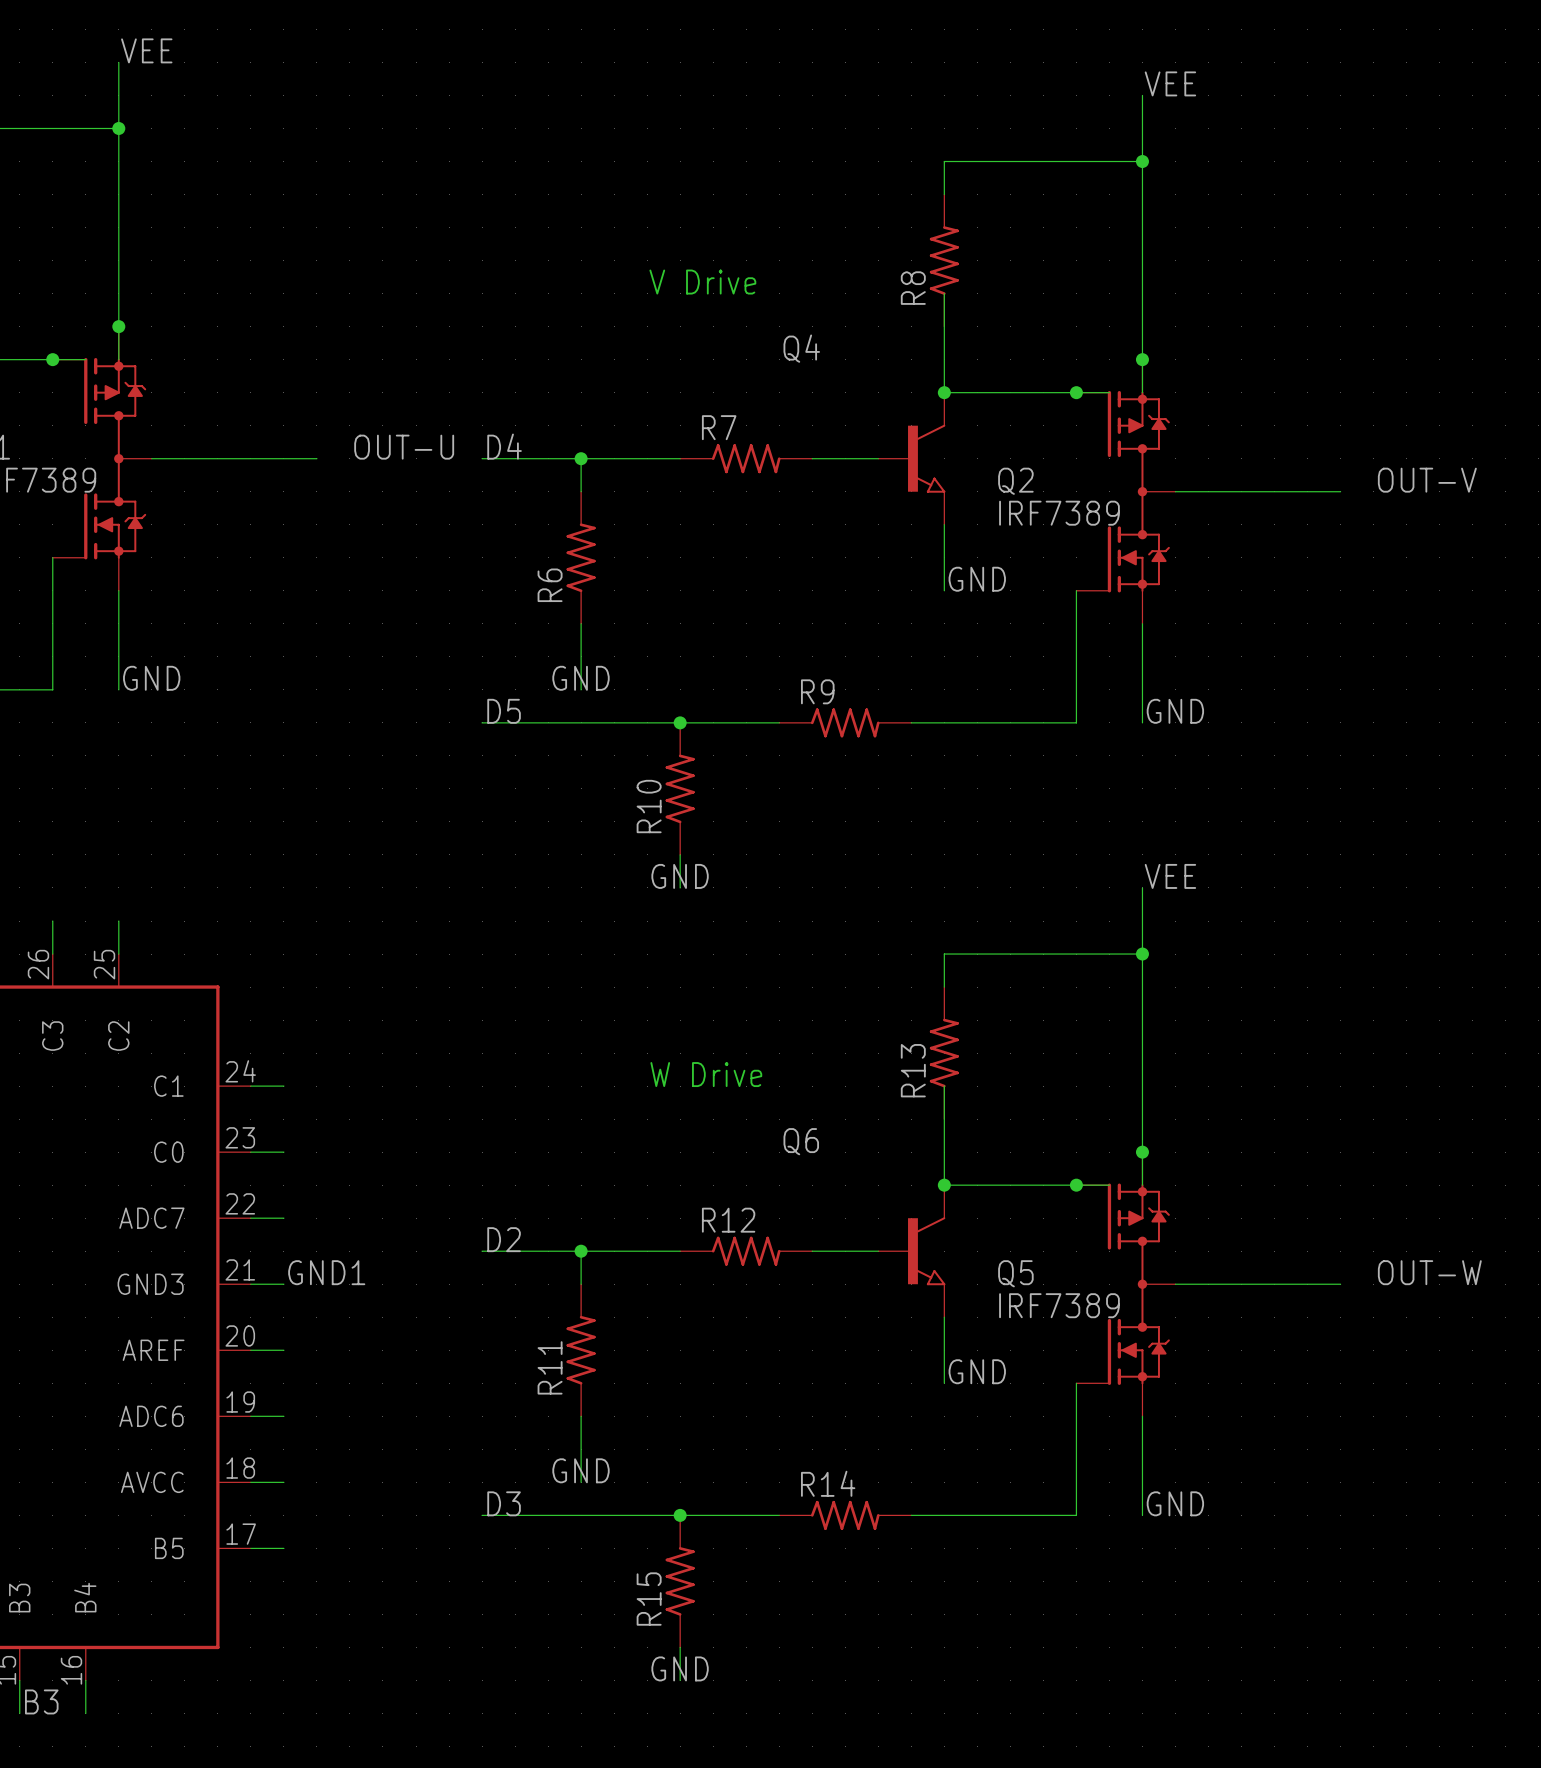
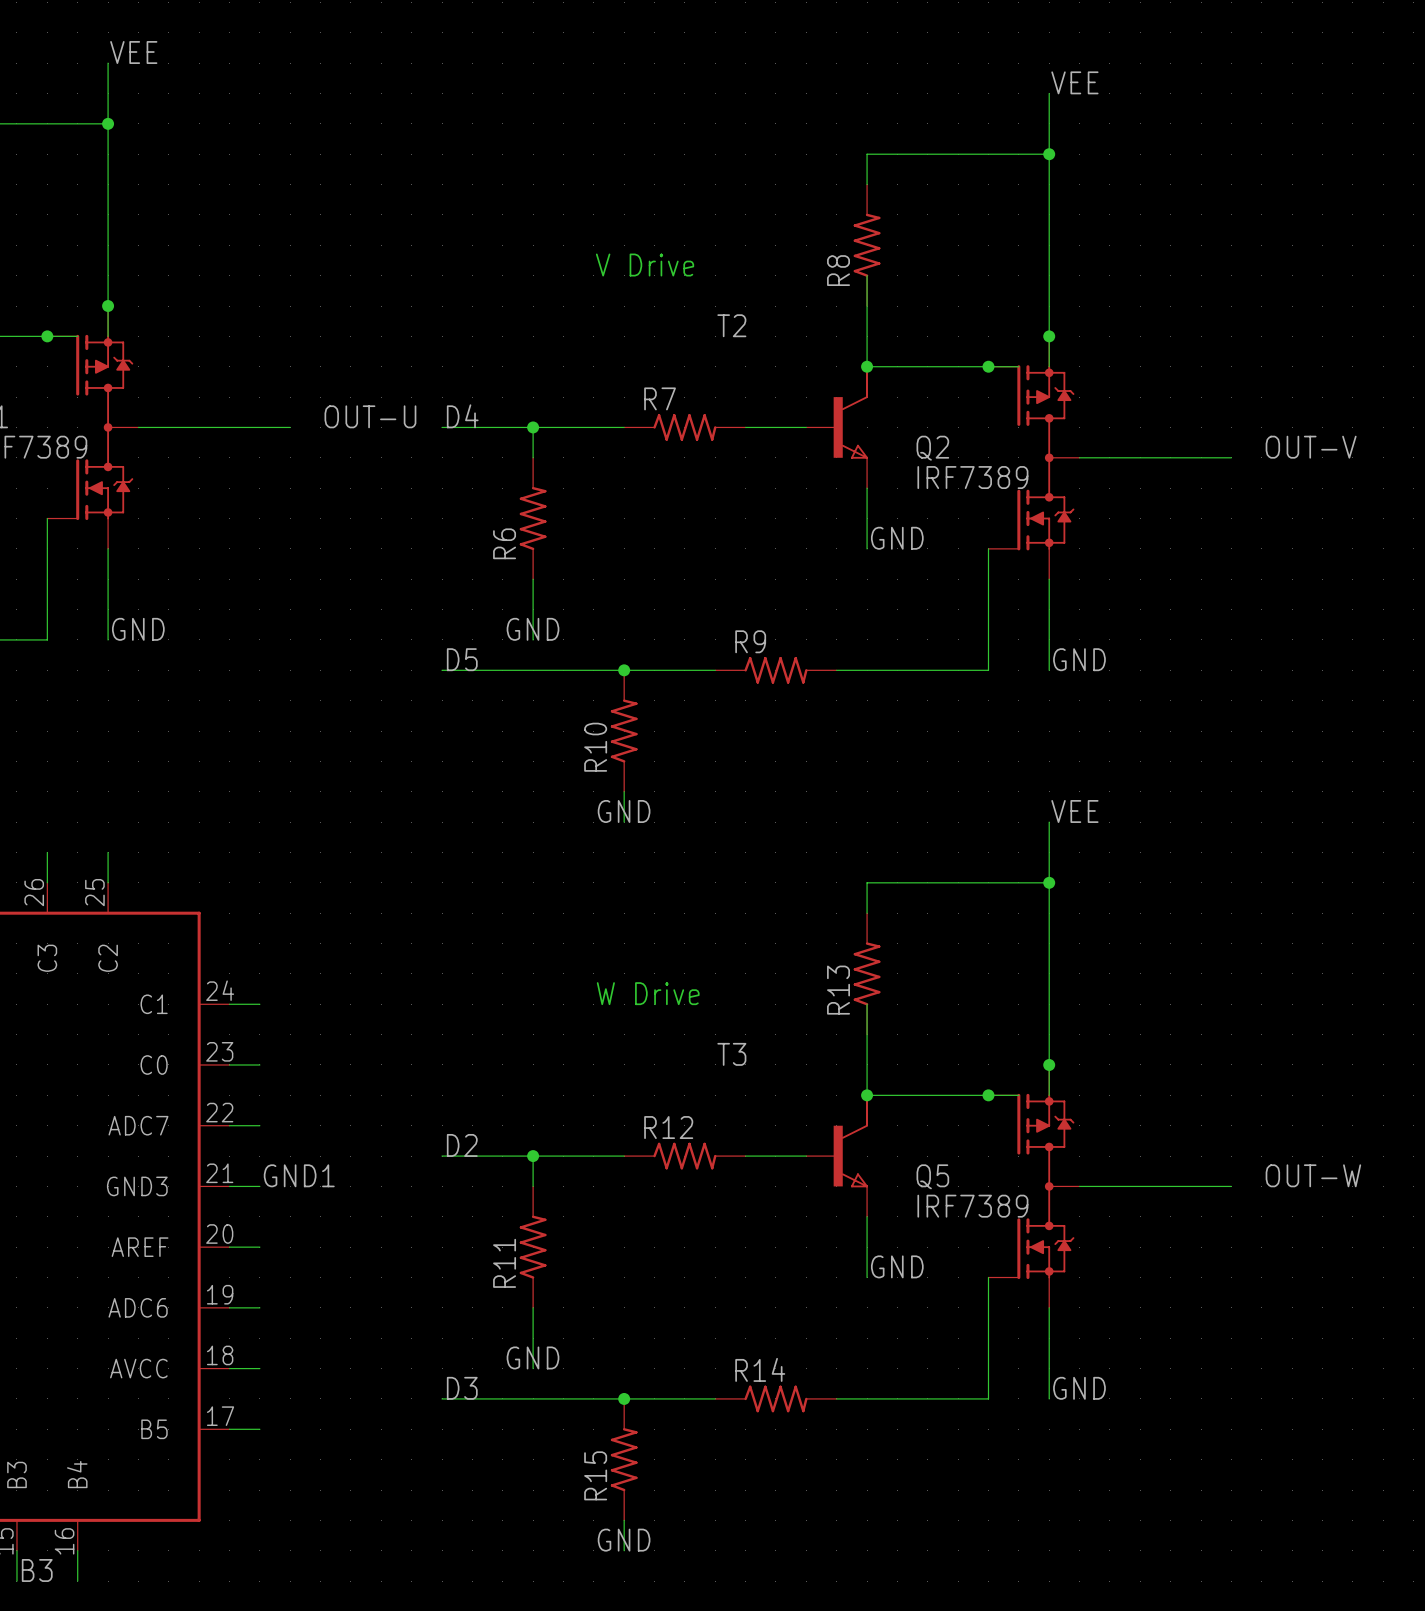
Q4: (911, 458) -> none
T2: none -> (837, 427)
Q6: (911, 1251) -> none
T3: none -> (837, 1156)

